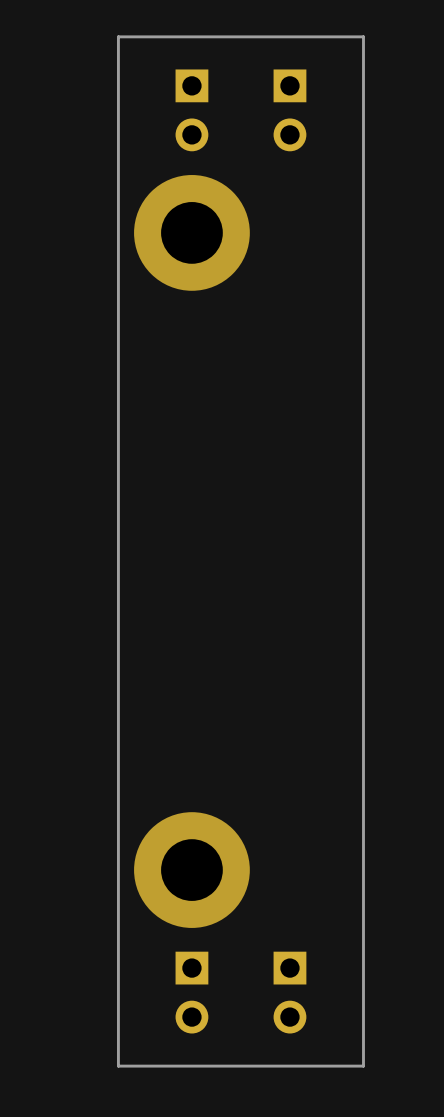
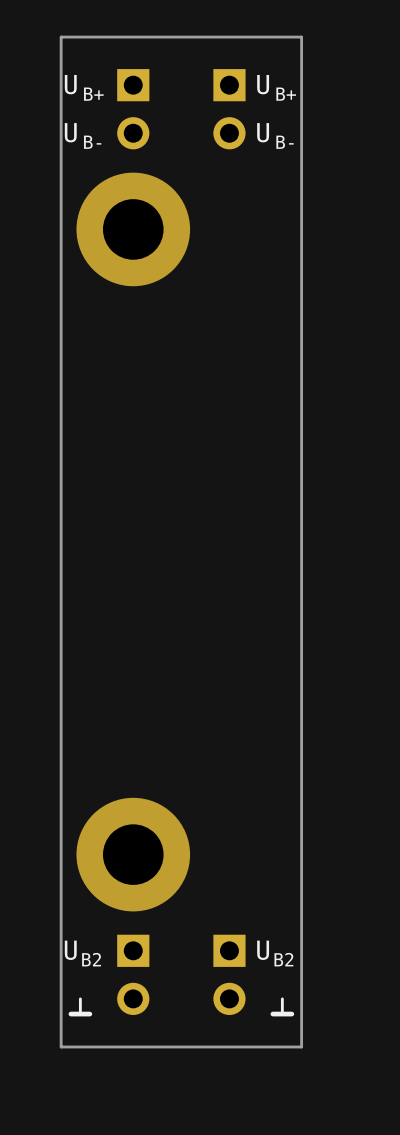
drawing: none -> [64, 74, 104, 149]
drawing: none -> [257, 74, 297, 149]
drawing: none -> [64, 940, 101, 967]
drawing: none -> [257, 940, 294, 967]
drawing: none -> [68, 997, 93, 1017]
drawing: none -> [270, 997, 295, 1017]

